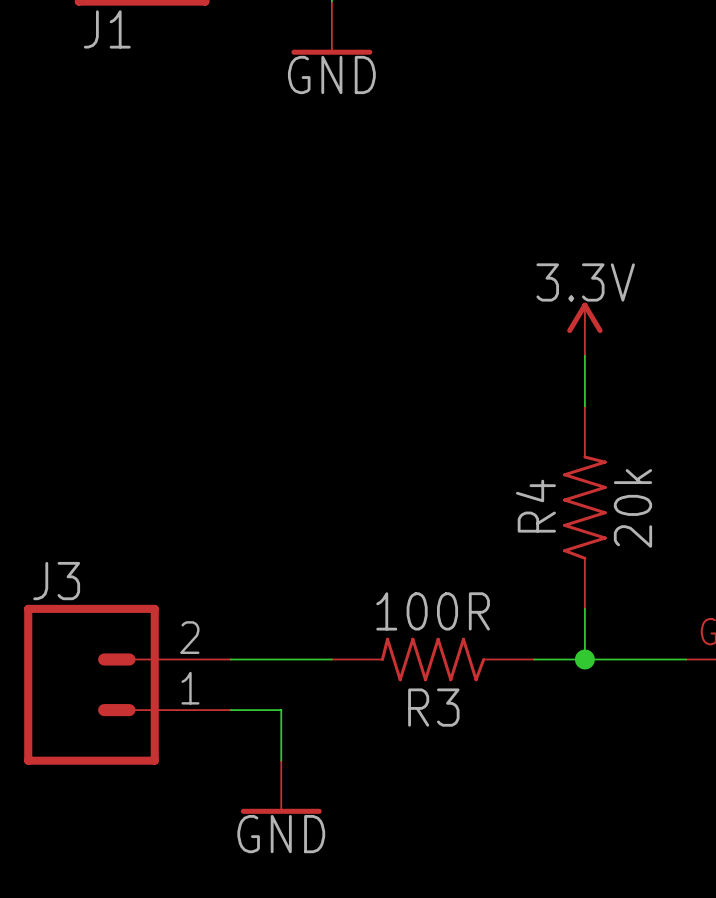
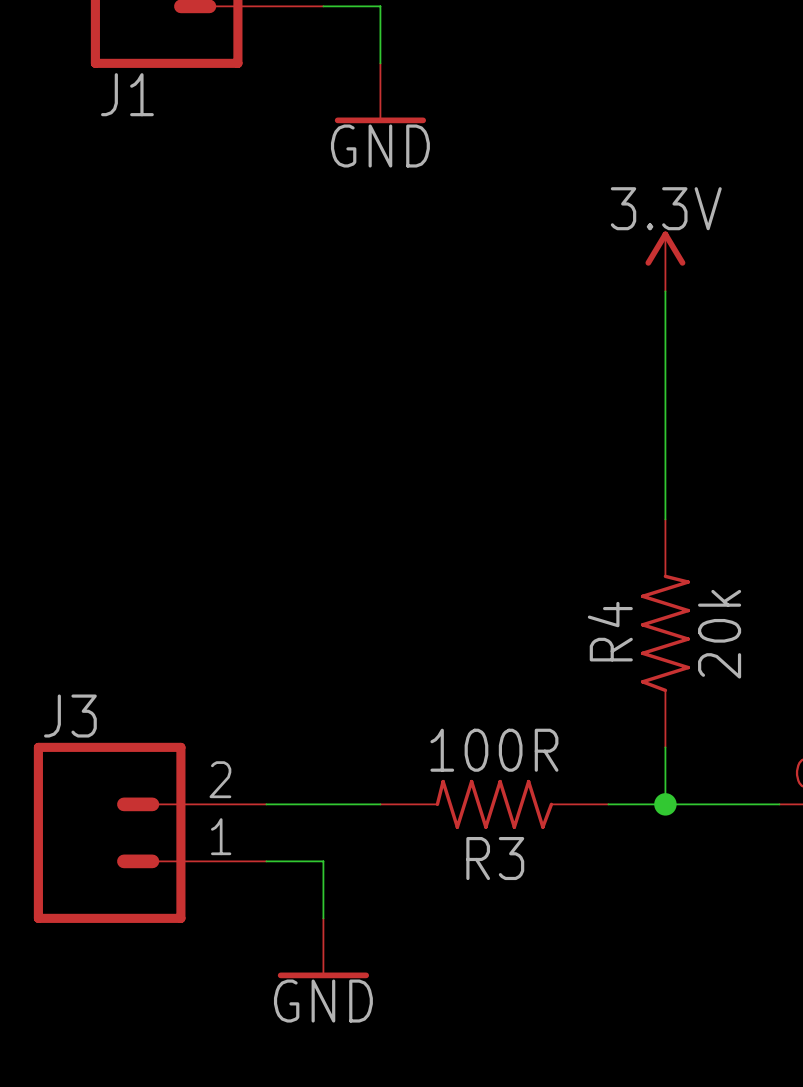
wire: none -> (665, 291) (665, 462)
power symbol position: 3.3V (584, 329) -> 3.3V (665, 261)

